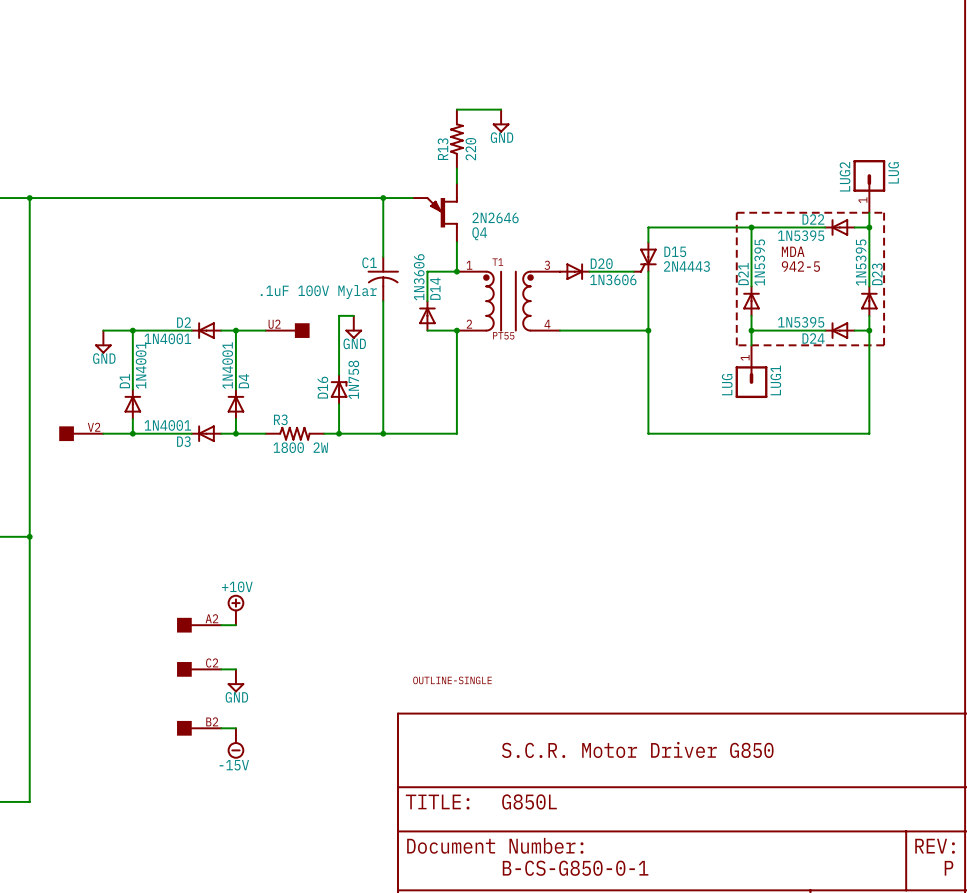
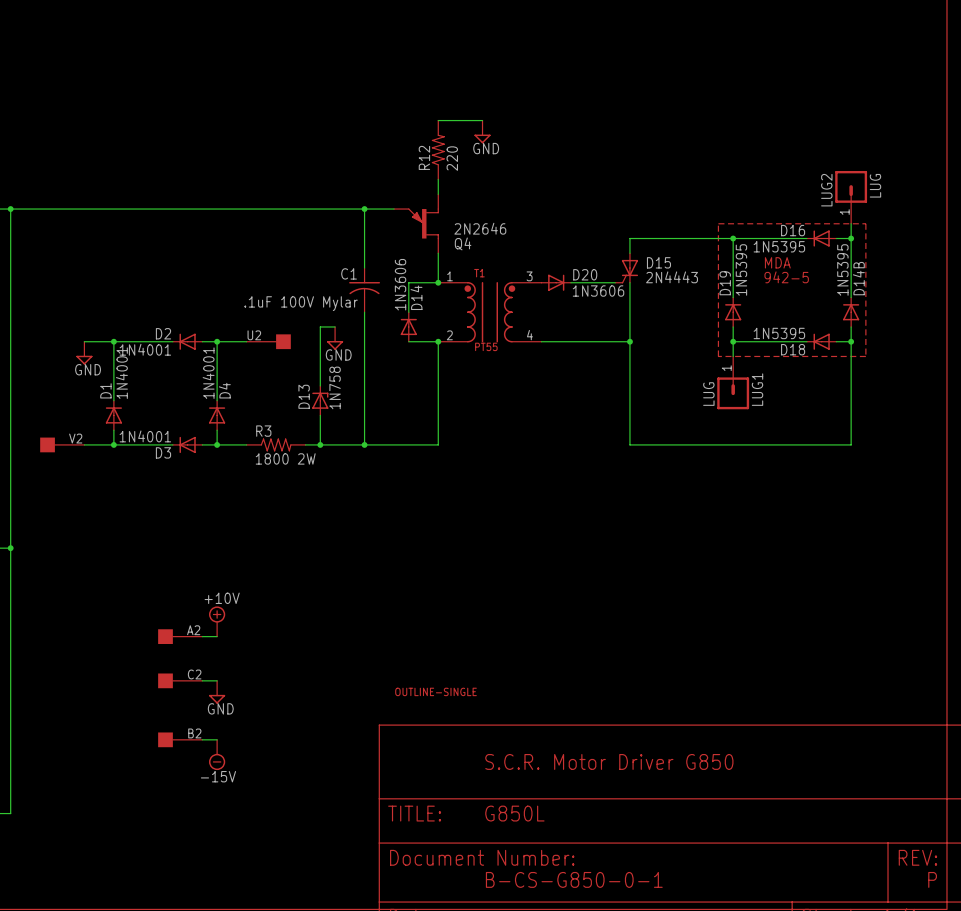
R13 name: R13 (443, 149) -> R12 (424, 157)
D22 name: D22 (813, 219) -> D16 (793, 230)
D21 name: D21 (743, 274) -> D19 (725, 283)
D23 name: D23 (877, 274) -> D14B (858, 278)
D24 name: D24 (813, 338) -> D18 (793, 349)
D16 name: D16 (322, 387) -> D13 (304, 396)

